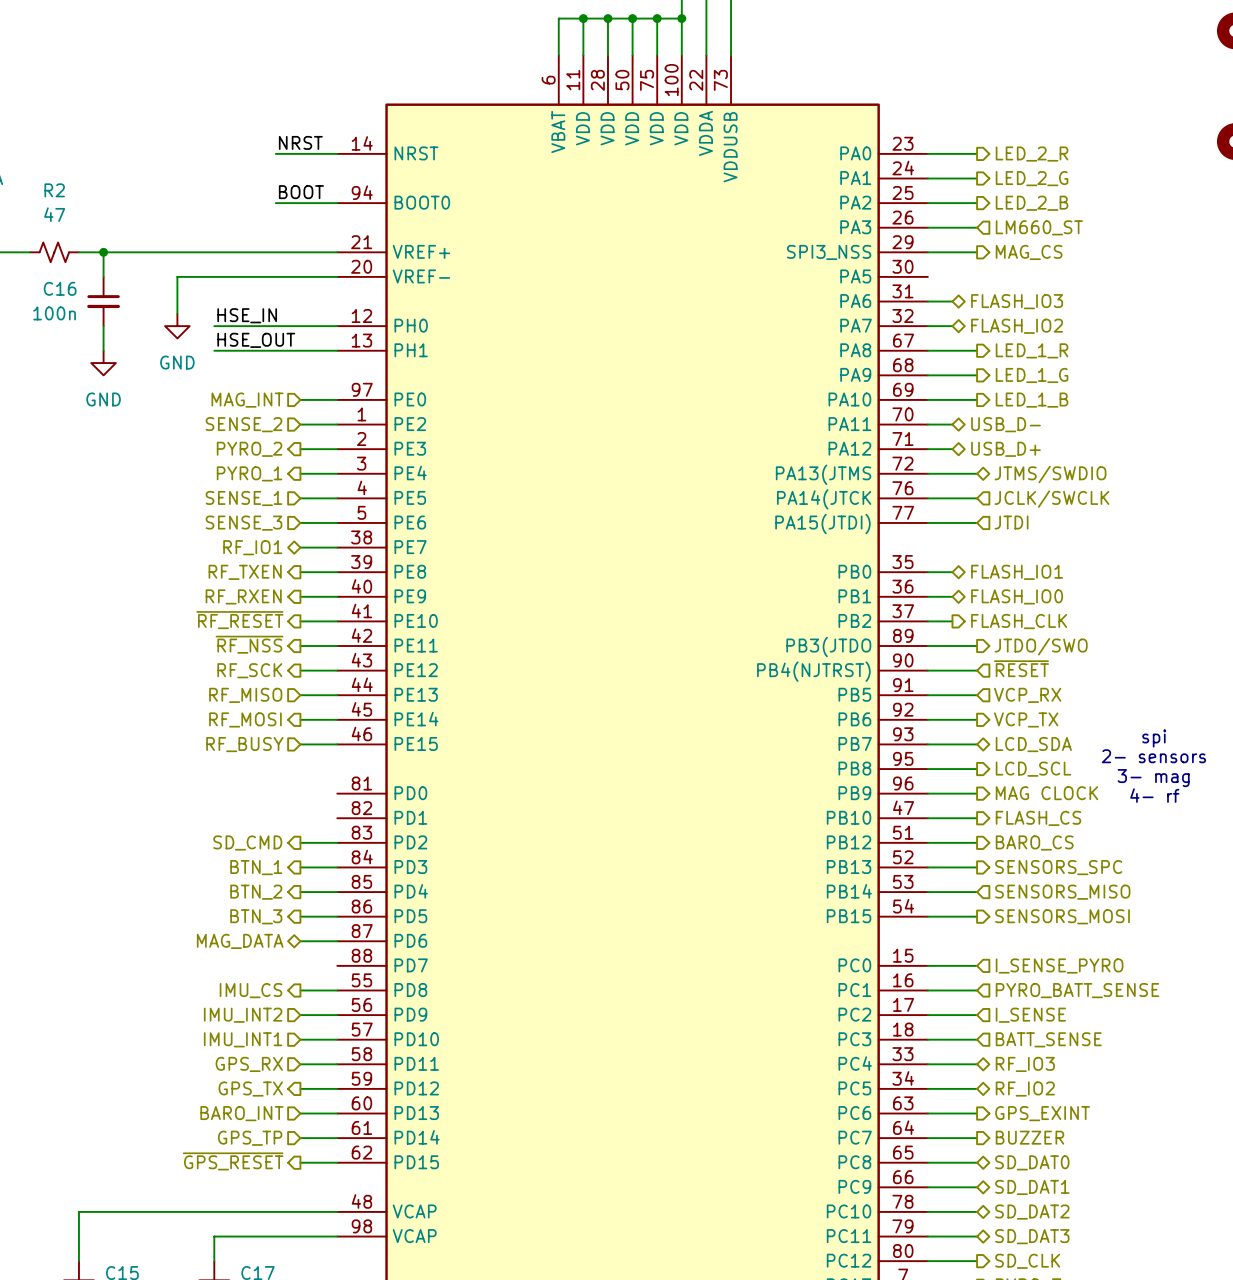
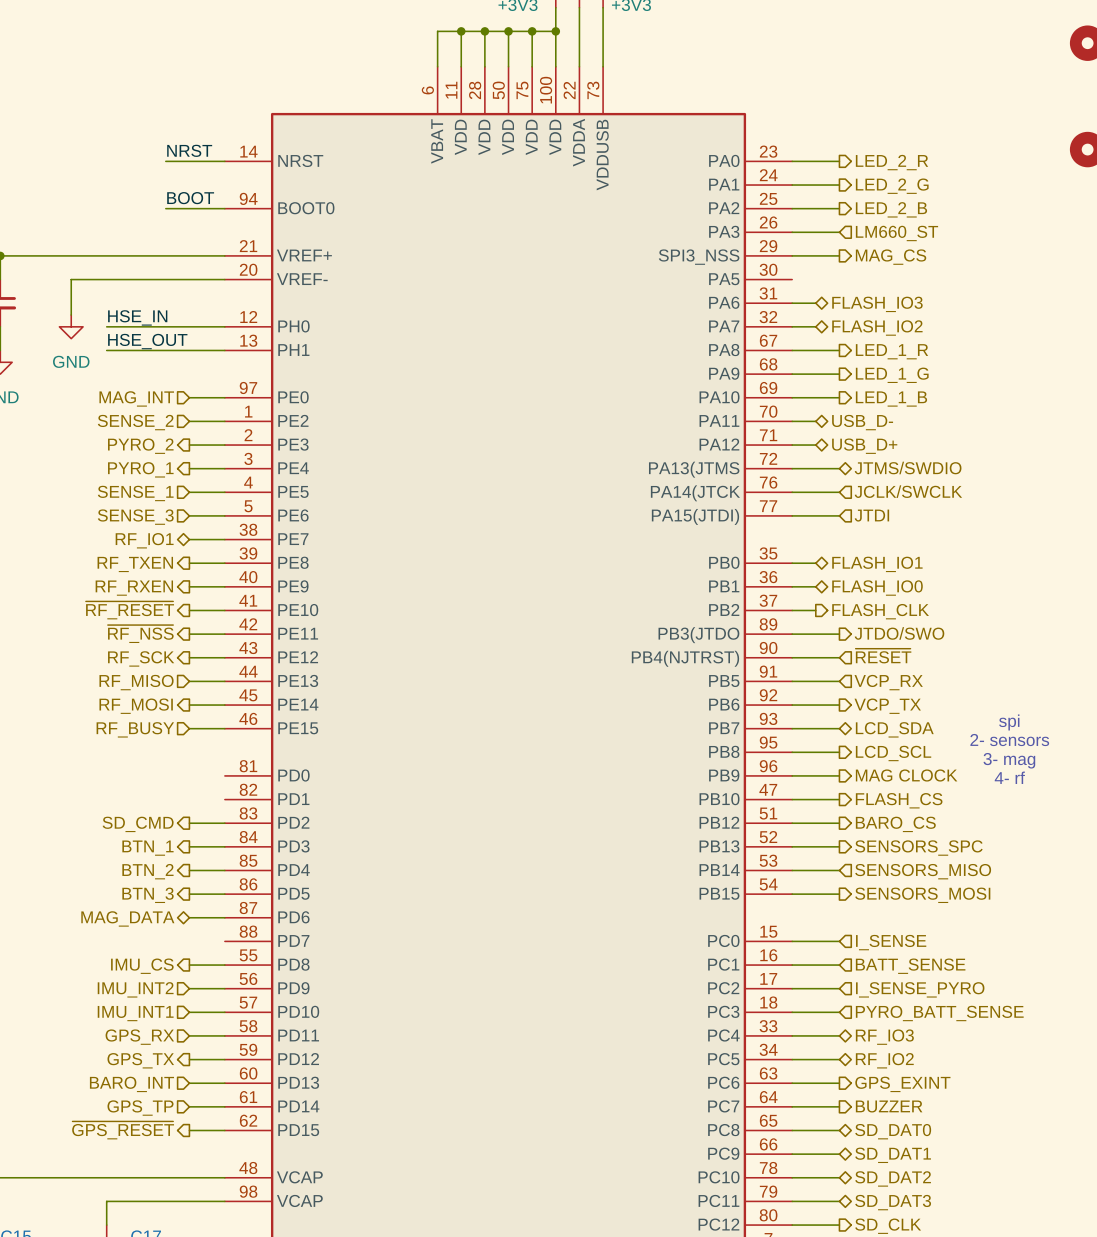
hierarchical label: I_SENSE_PYRO (1059, 966) -> I_SENSE (891, 942)
hierarchical label: PYRO_BATT_SENSE (1077, 990) -> BATT_SENSE (910, 966)
hierarchical label: I_SENSE (1030, 1015) -> I_SENSE_PYRO (920, 989)
hierarchical label: BATT_SENSE (1048, 1039) -> PYRO_BATT_SENSE (939, 1013)

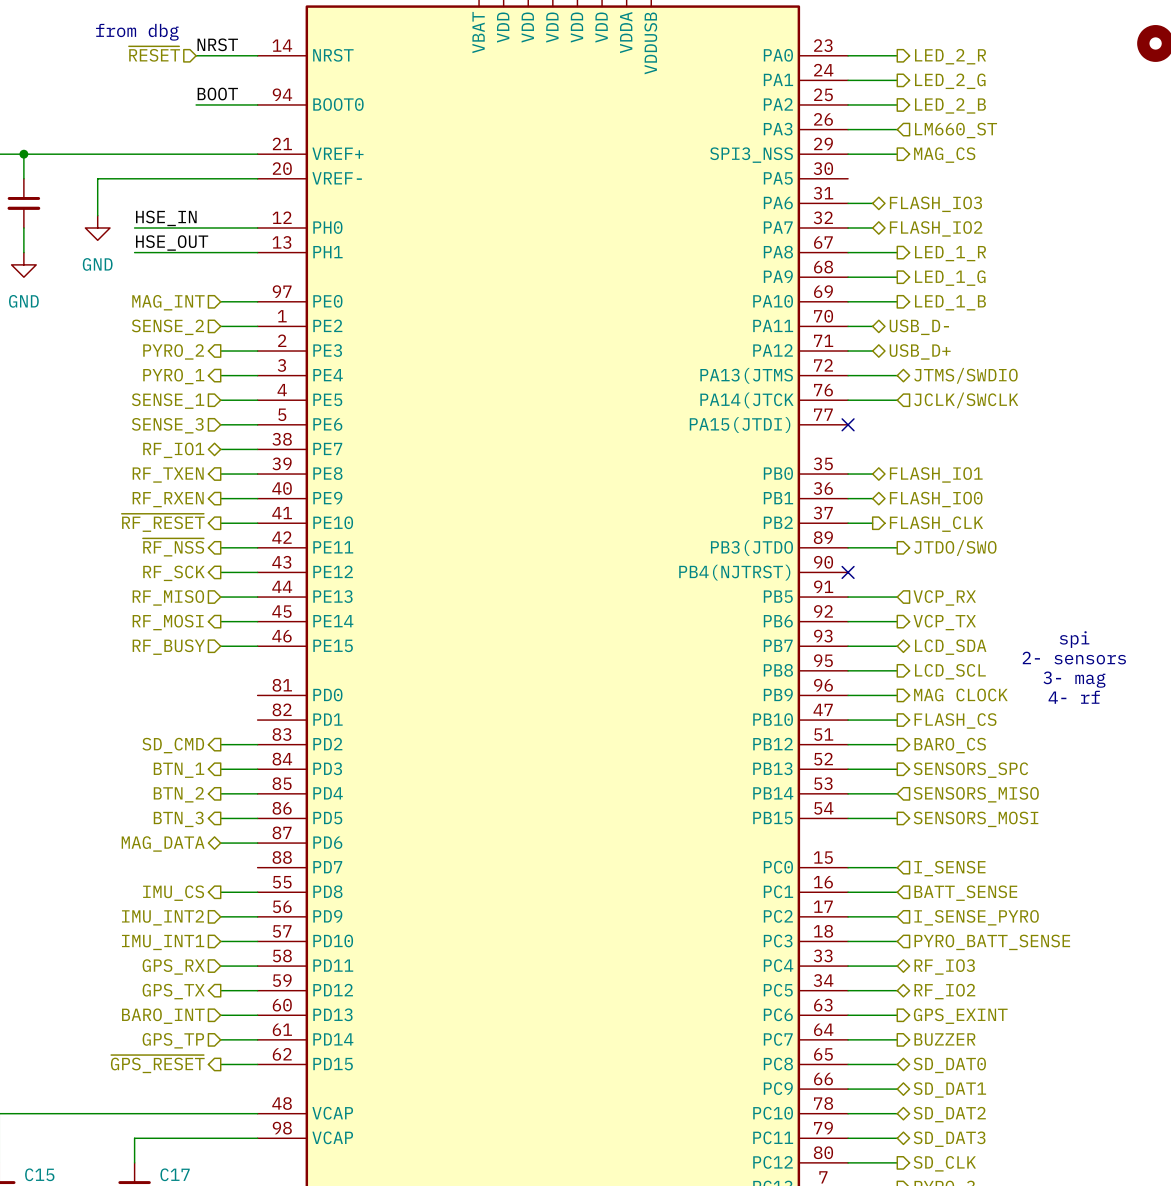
text: none -> from dbg (137, 32)
hierarchical label: none -> ~{RESET} (154, 54)
wire: (792, 515) (839, 515) -> none
no-connect mark: none -> (848, 424)
hierarchical label: JTDI (871, 515) -> none
hierarchical label: ~{RESET} (883, 656) -> none
wire: (792, 657) (839, 657) -> none
no-connect mark: none -> (848, 572)

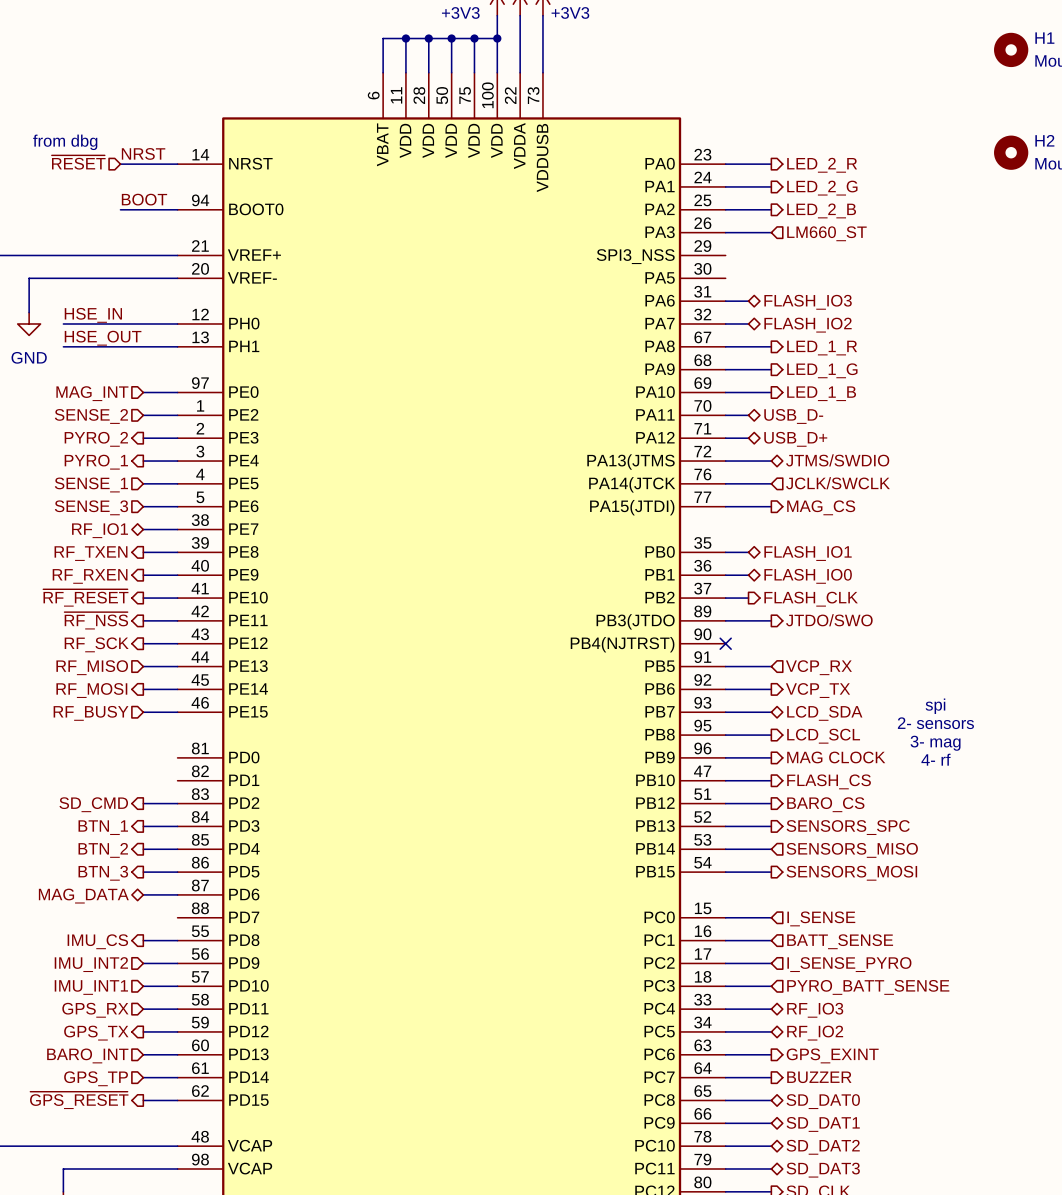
wire: (848, 154) (897, 154) -> none
hierarchical label: MAG_CS (944, 155) -> none
wire: none -> (725, 506) (771, 506)
no-connect mark: (848, 424) -> none
hierarchical label: none -> MAG_CS (821, 507)

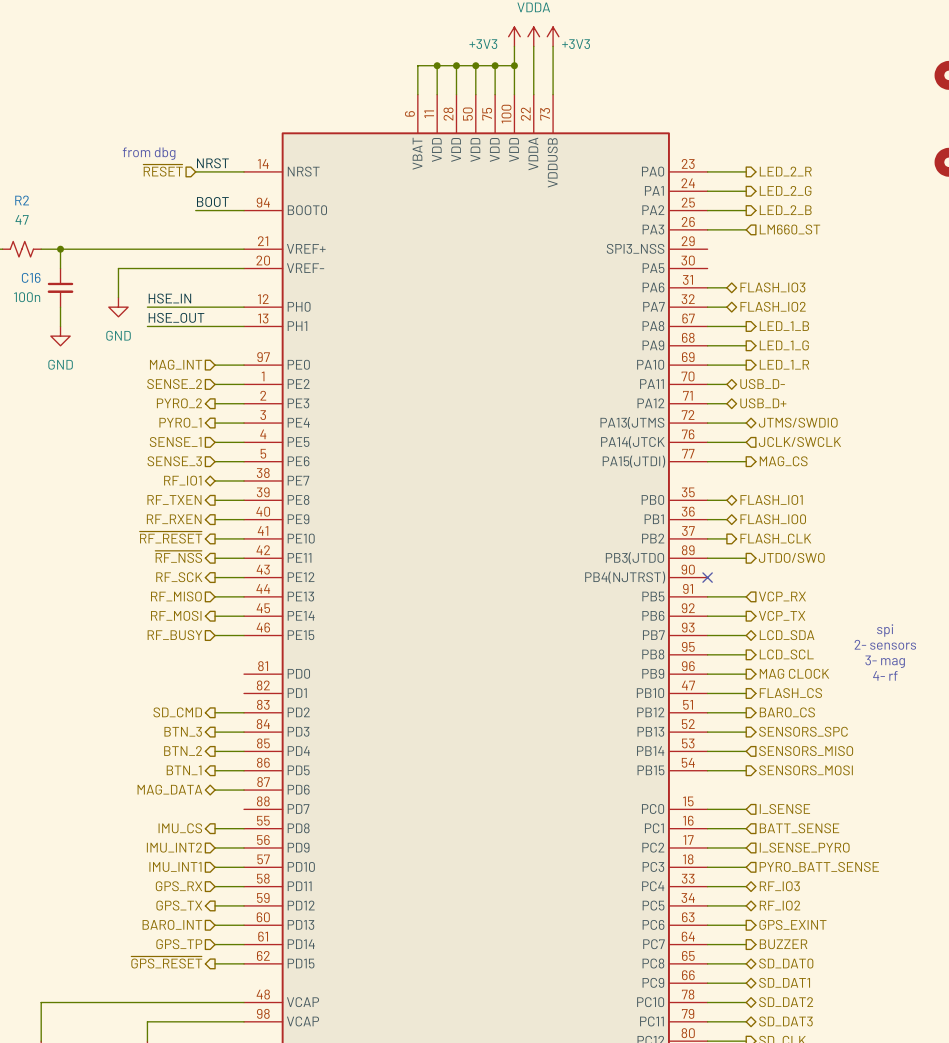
hierarchical label: LED_1_R (822, 348) -> LED_1_B (784, 326)
hierarchical label: LED_1_B (821, 393) -> LED_1_R (784, 364)
hierarchical label: BTN_1 (103, 827) -> BTN_3 (183, 731)
hierarchical label: BTN_3 (103, 873) -> BTN_1 (184, 770)

